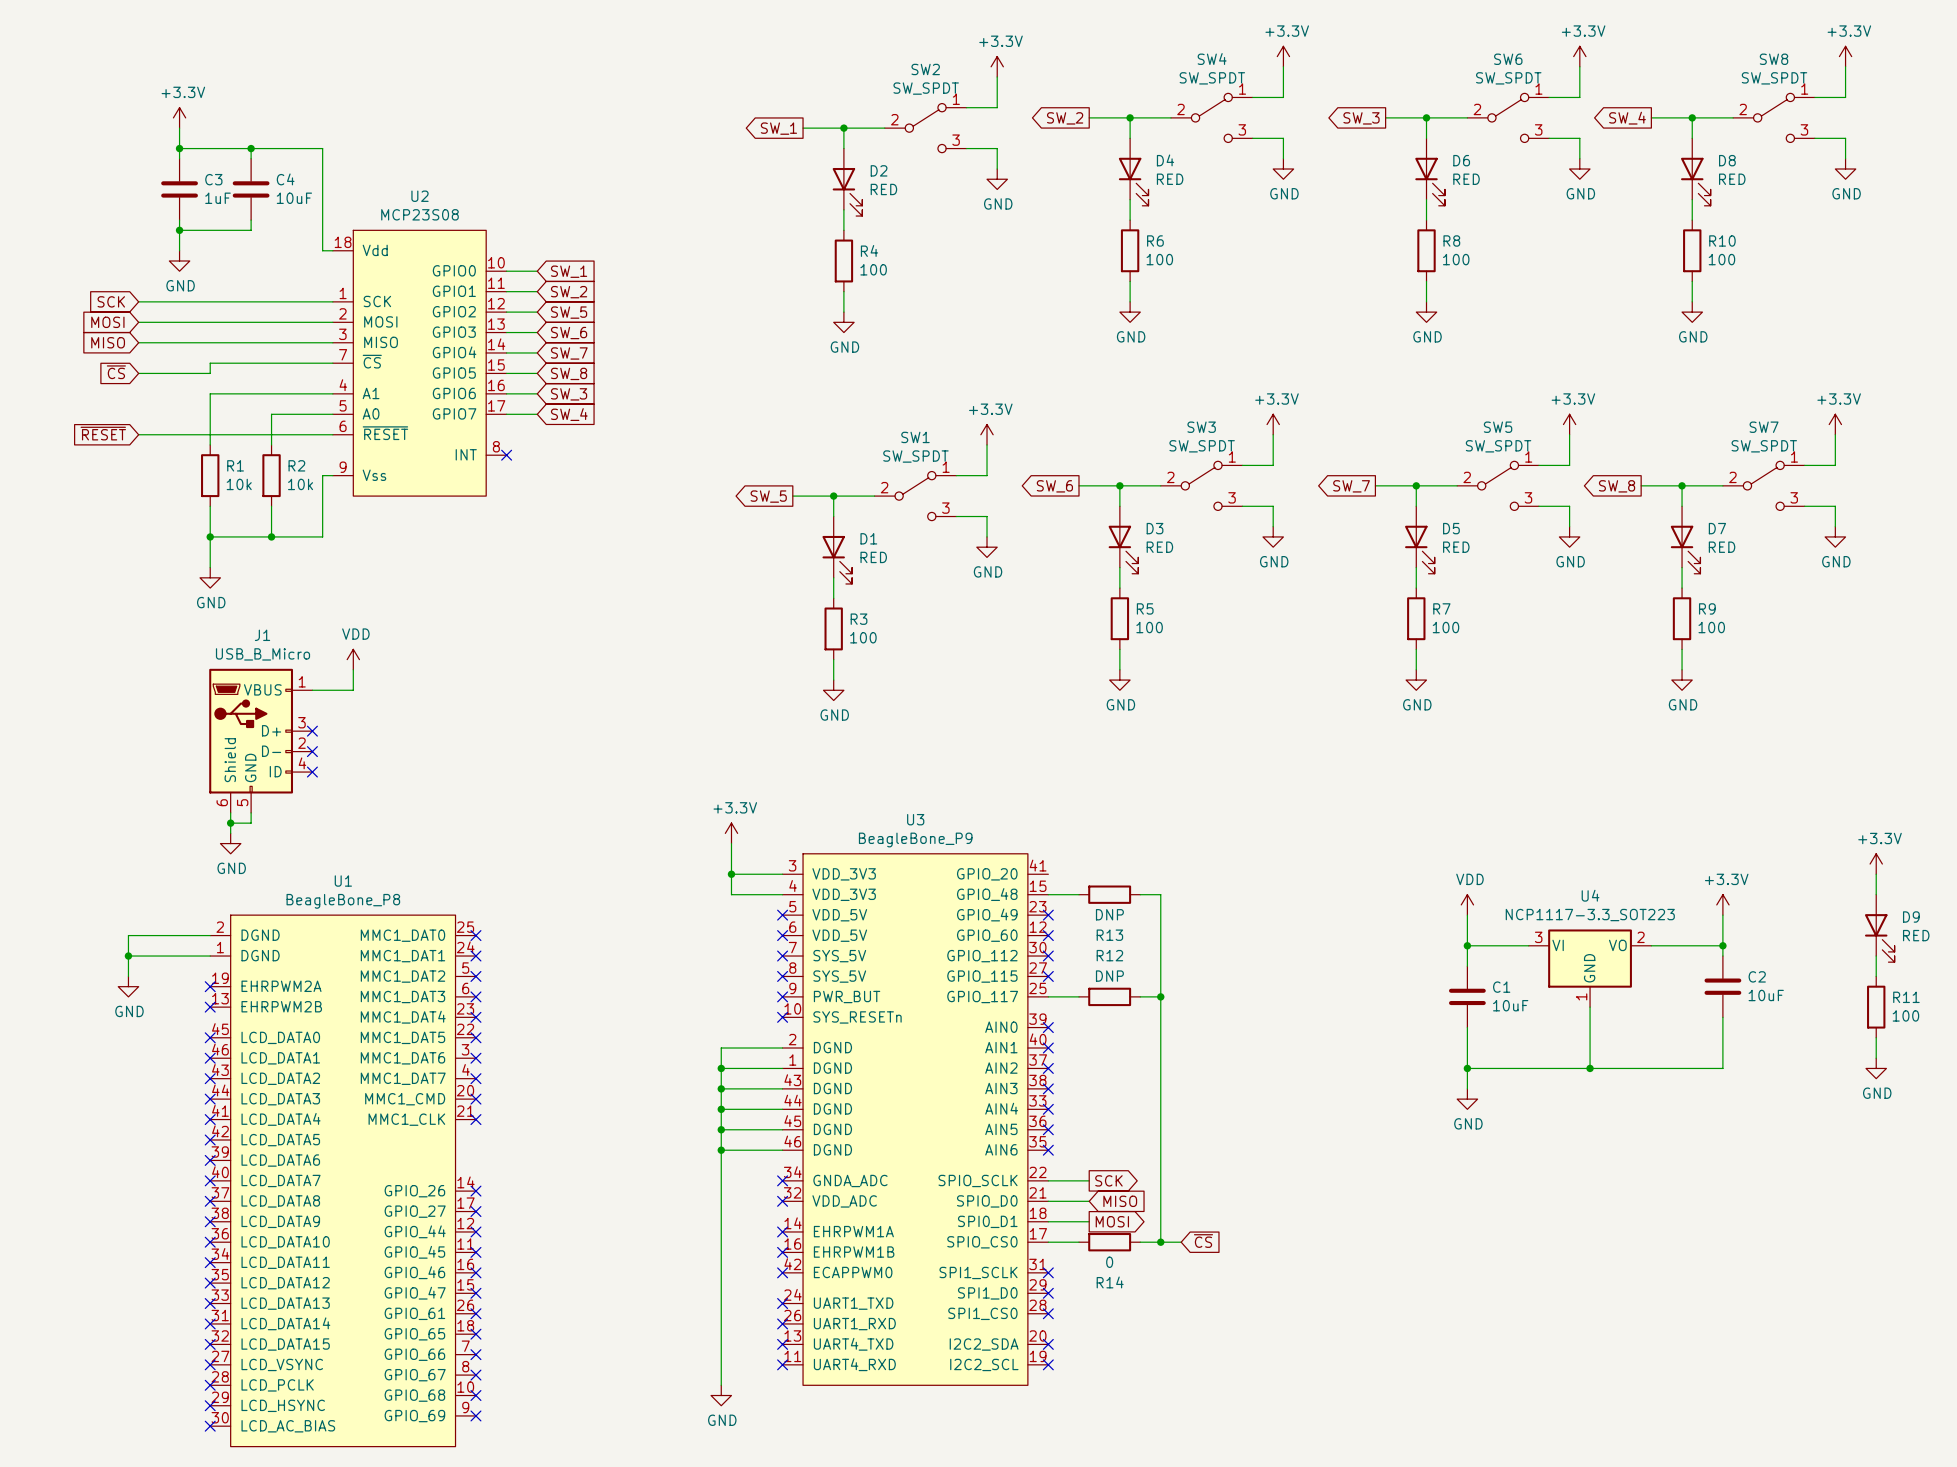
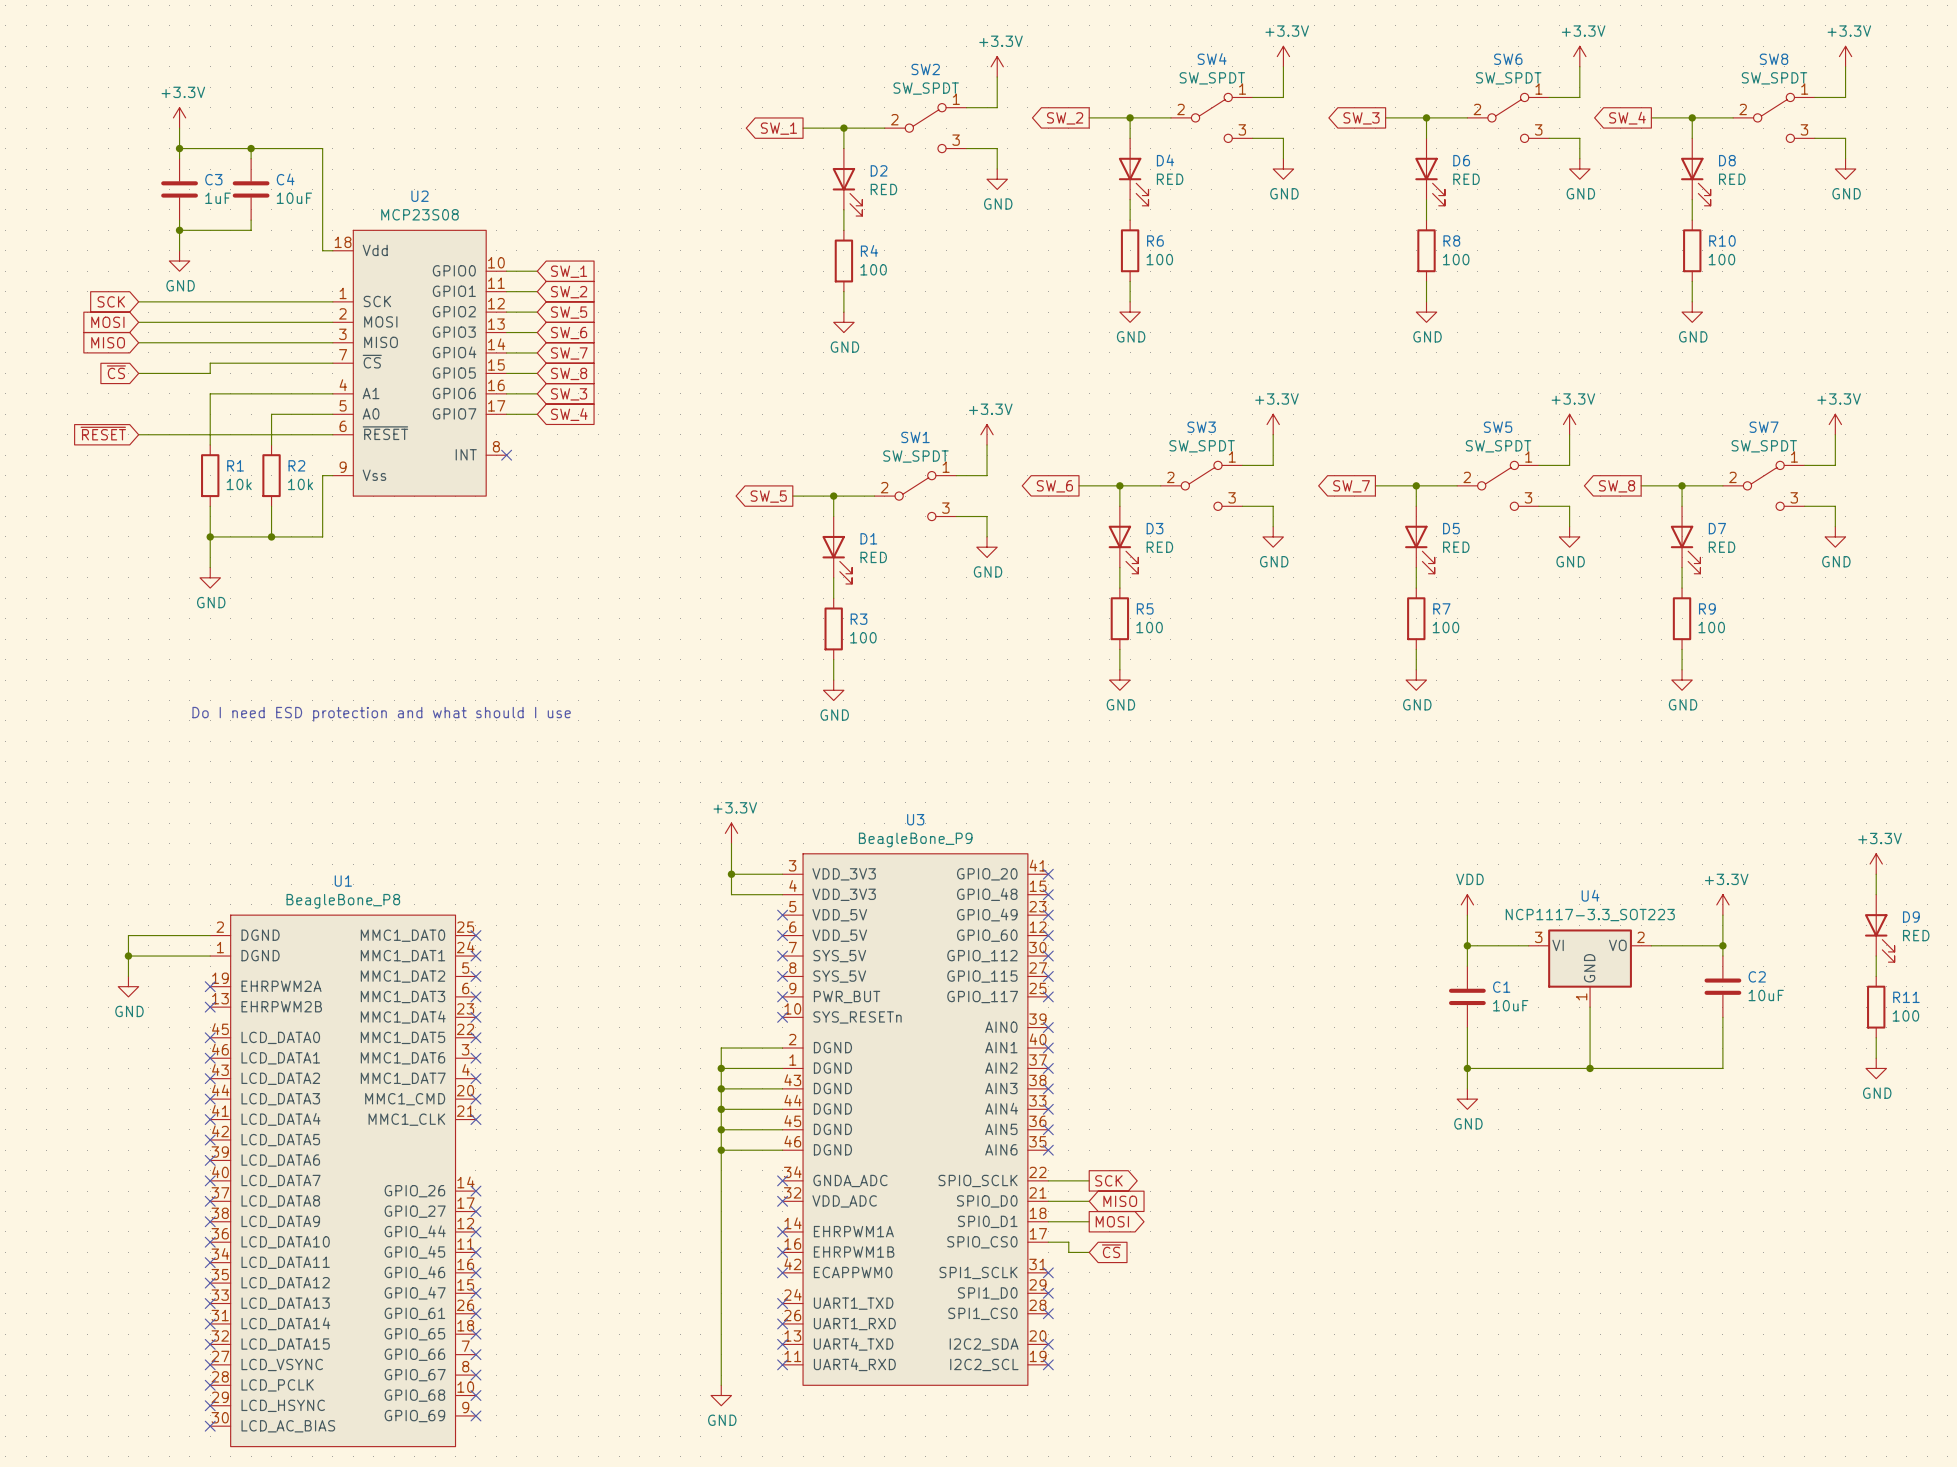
power symbol: VDD (353, 659) -> none
wire: (353, 669) (353, 690) (312, 690) -> none
text: none -> Do I need ESD protection and what should I use (381, 714)
no-connect mark: (312, 731) -> none
J1: USB_B_Micro (260, 740) -> none
no-connect mark: (312, 751) -> none
no-connect mark: (312, 772) -> none
wire: (230, 812) (230, 833) -> none
wire: (251, 812) (251, 823) (230, 823) -> none
junction: (230, 823) -> none
power symbol: GND (230, 843) -> none
no-connect mark: none -> (1048, 874)
wire: (1048, 894) (1078, 894) -> none
no-connect mark: none -> (1048, 894)
R13: DNP (1109, 894) -> none
wire: (1140, 894) (1160, 894) (1160, 1242) -> none
wire: (1048, 996) (1078, 996) -> none
no-connect mark: none -> (1048, 996)
R12: DNP (1109, 996) -> none
wire: (1140, 996) (1160, 996) -> none
junction: (1160, 996) -> none
global label position: ~{CS} (1203, 1241) -> ~{CS} (1111, 1251)
wire: (1068, 1242) (1078, 1242) -> (1068, 1242) (1068, 1252) (1089, 1252)
R14: 0 (1109, 1242) -> none
wire: (1140, 1242) (1181, 1242) -> none
junction: (1160, 1242) -> none

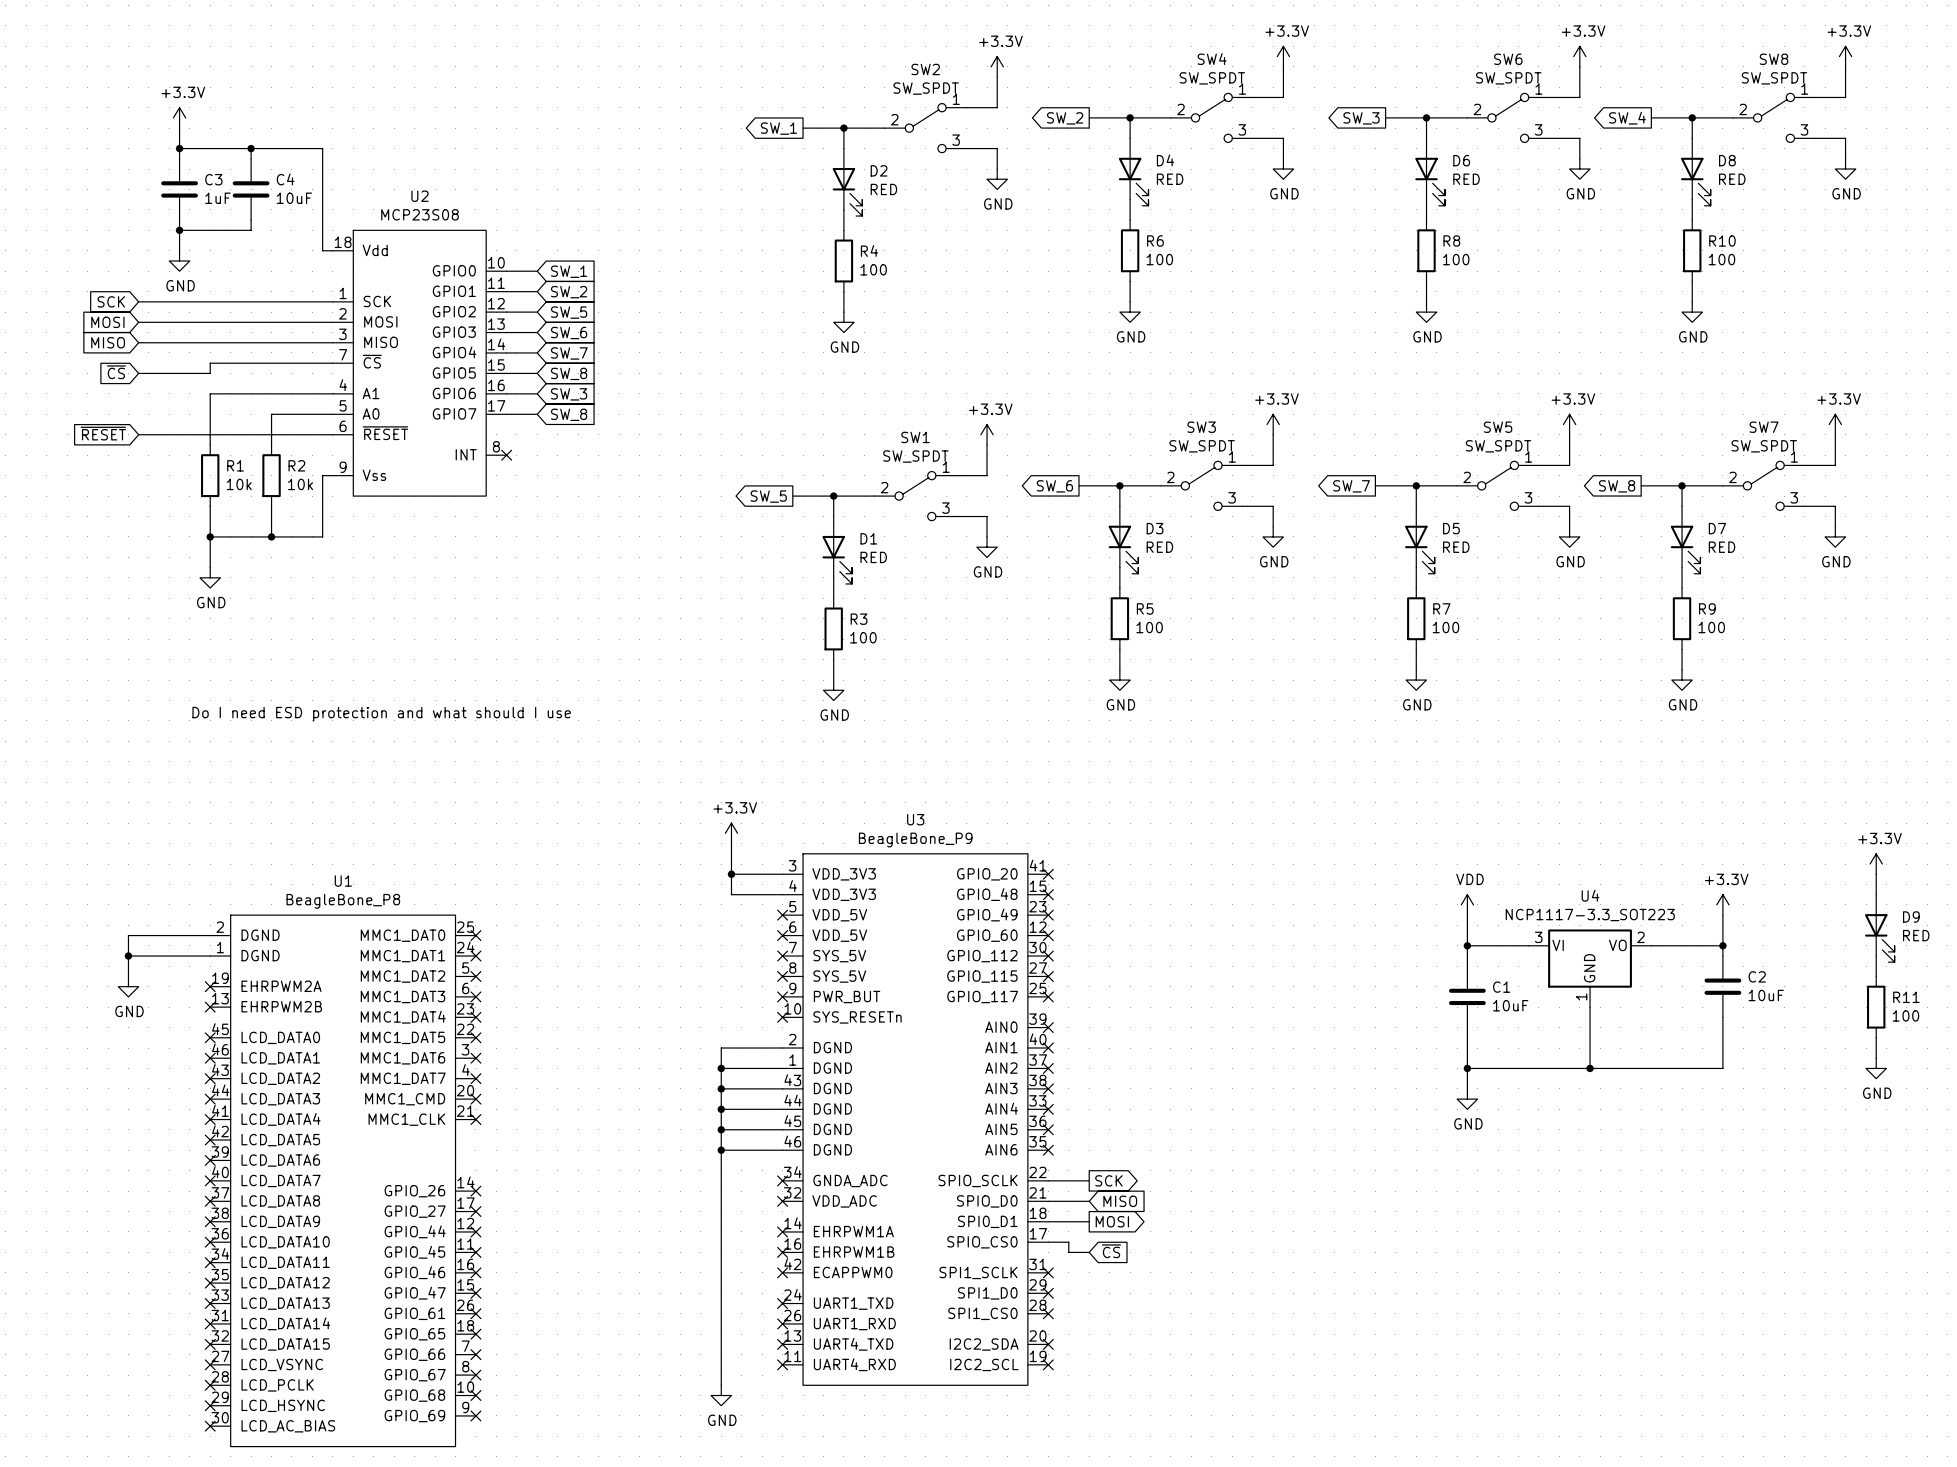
global label: SW_4 (569, 414) -> SW_8 (569, 414)

